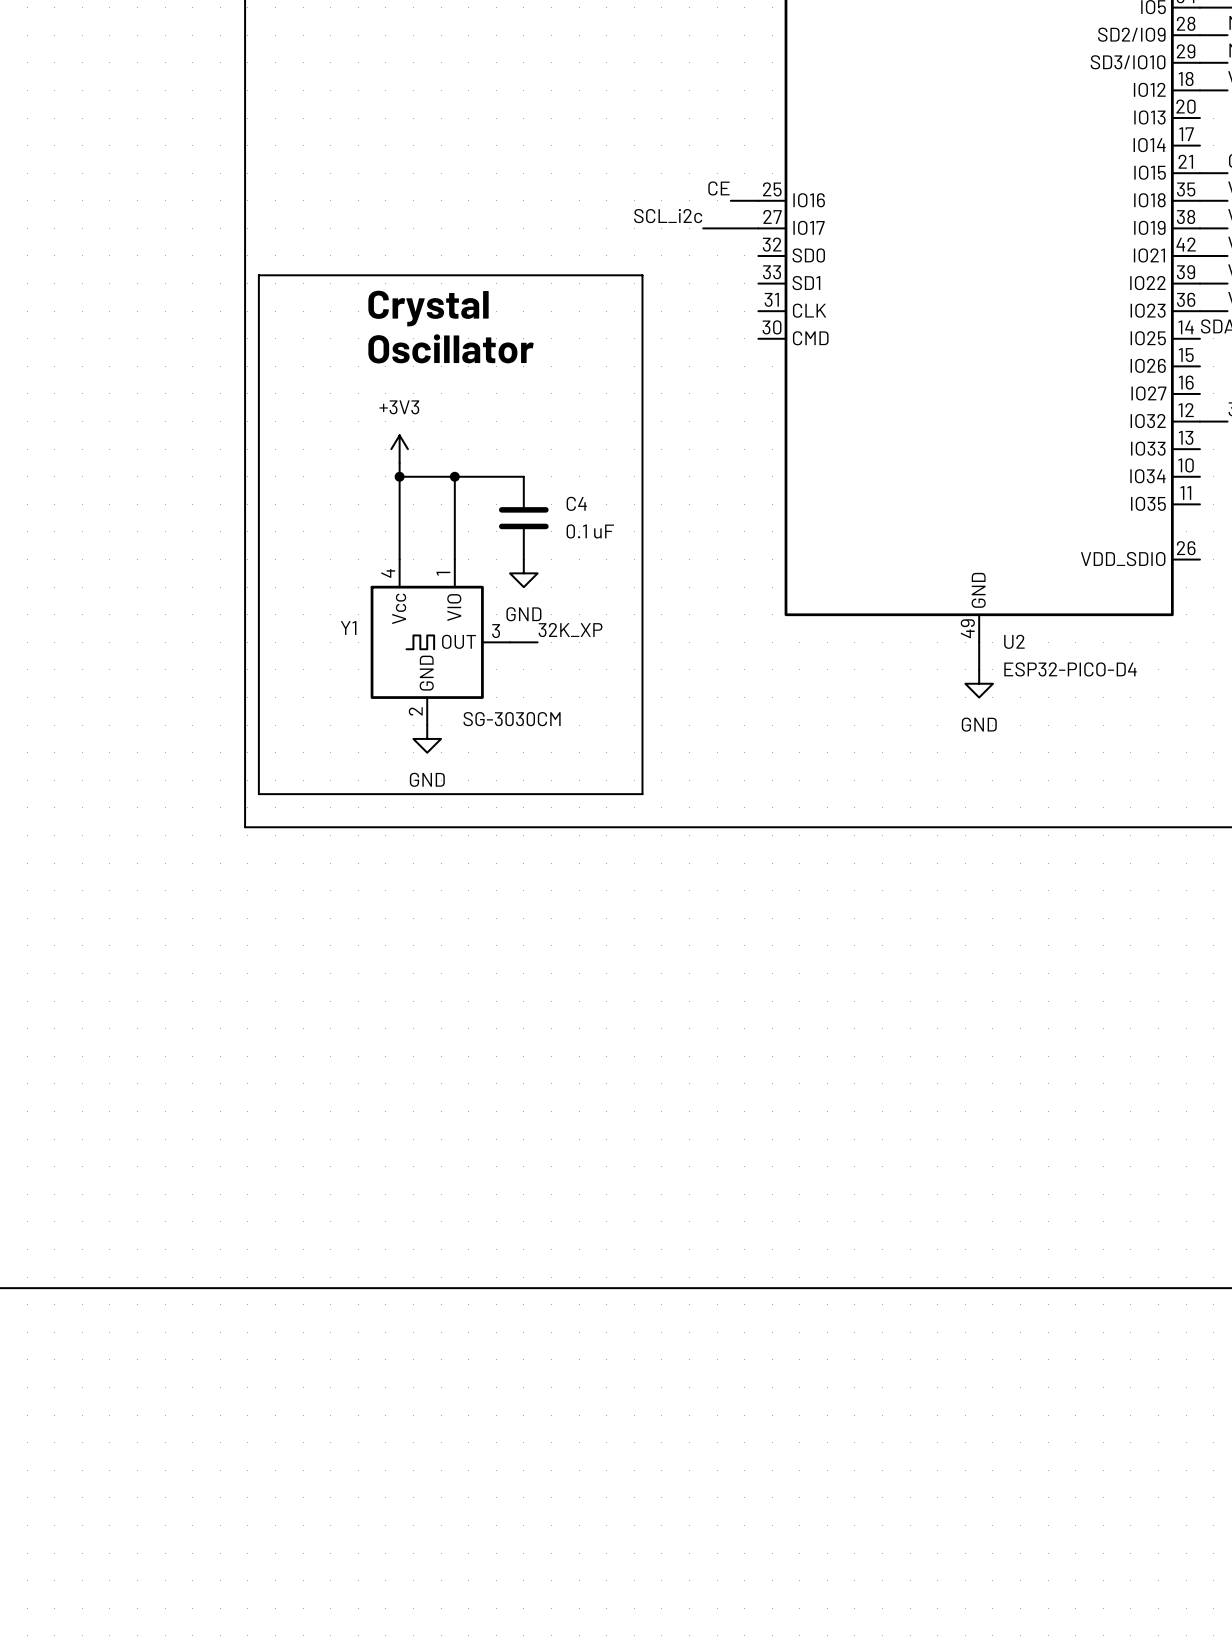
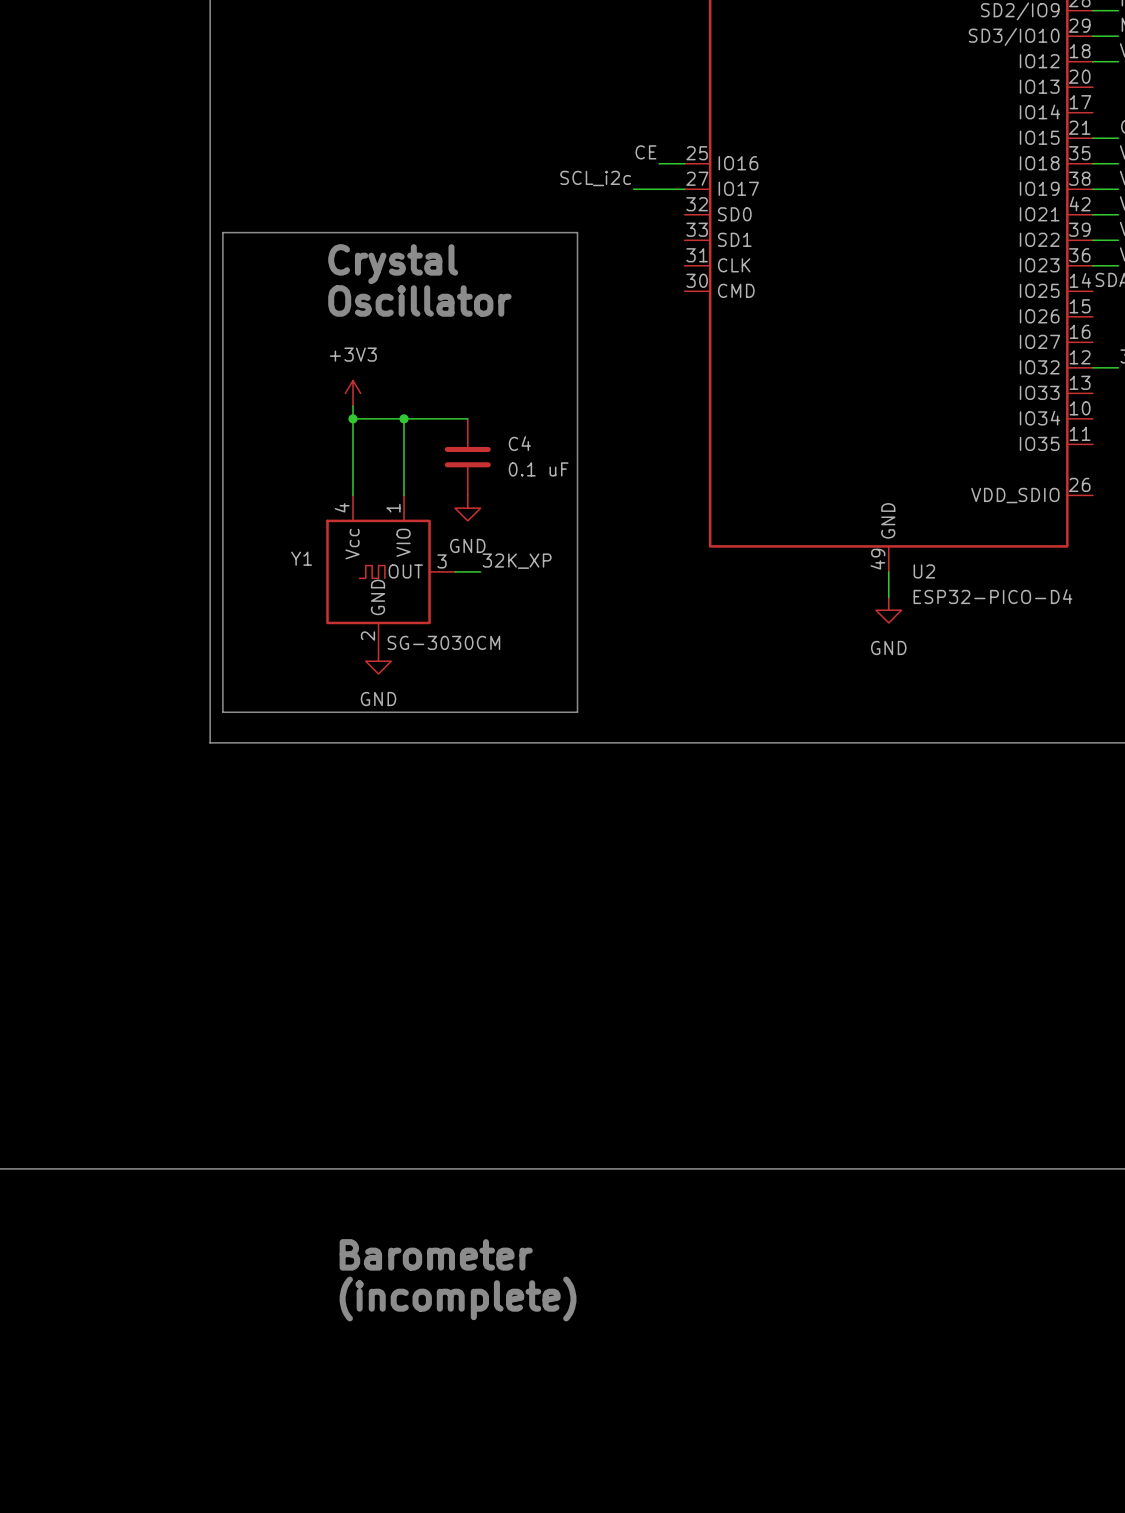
text: none -> Barometer (436, 1254)
text: none -> (incomplete) (458, 1298)

